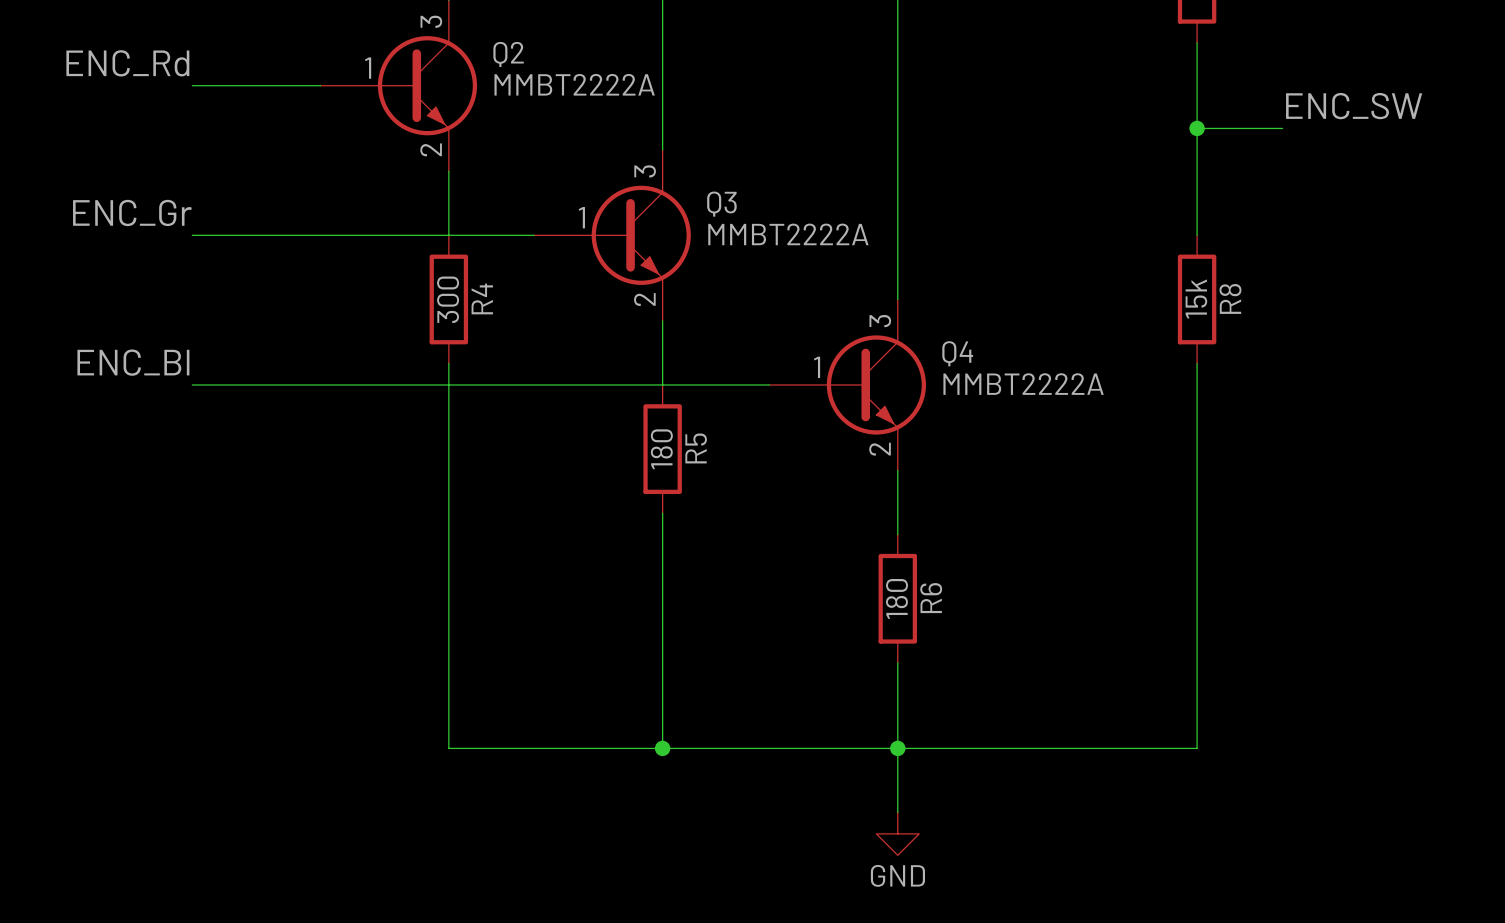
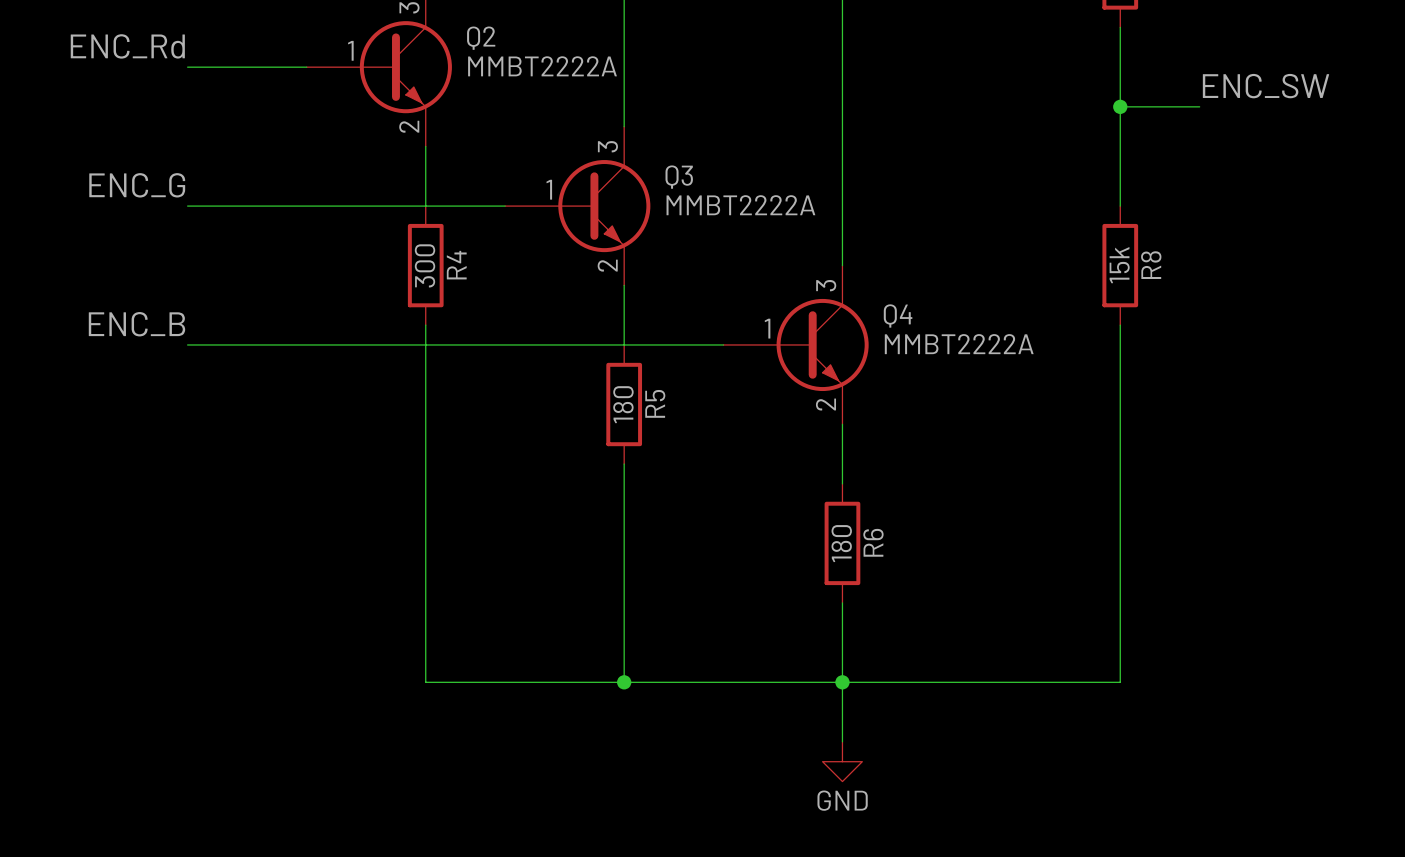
label: ENC_Gr (132, 212) -> ENC_G (137, 185)
label: ENC_Bl (133, 362) -> ENC_B (136, 324)

